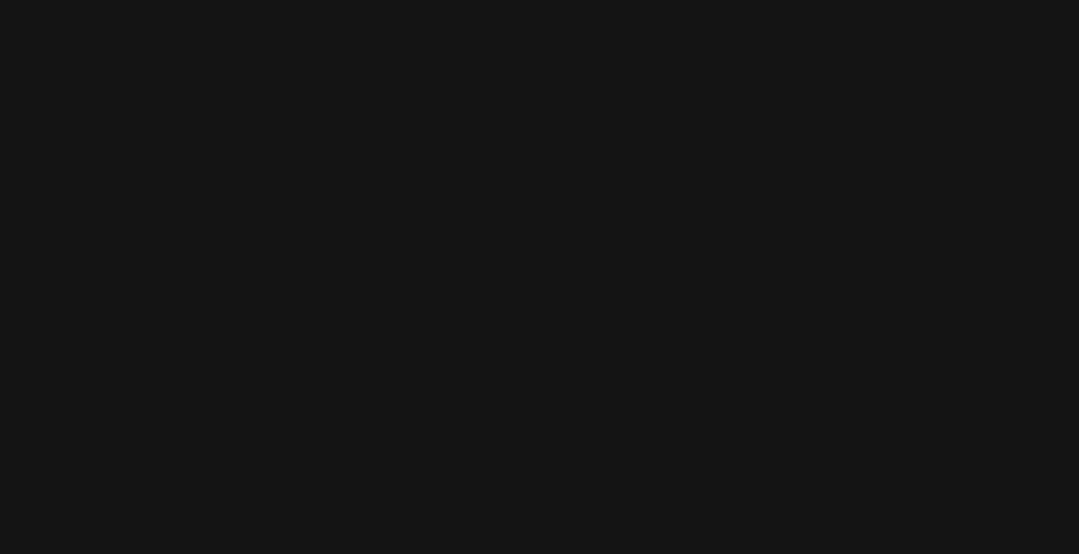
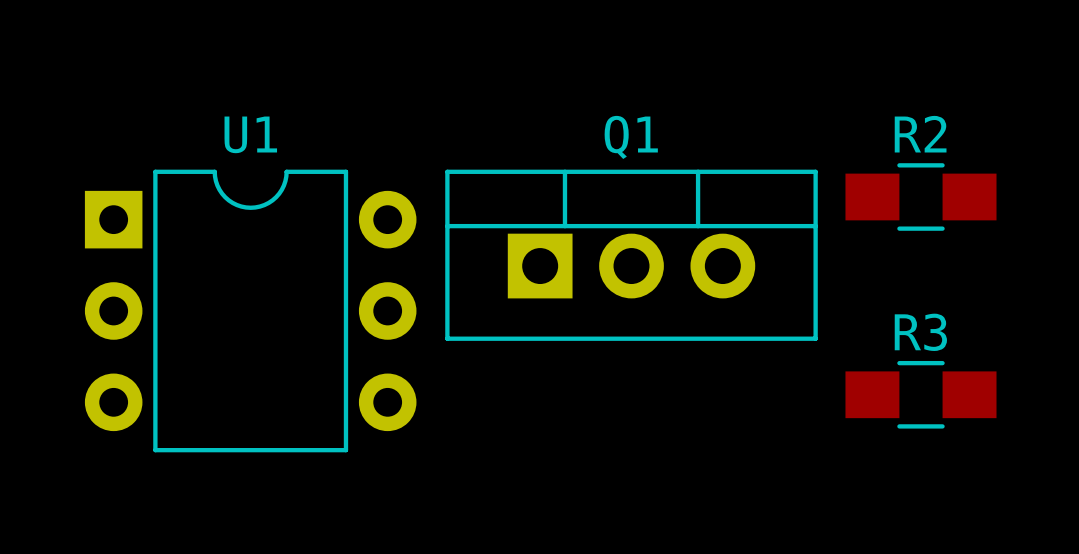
R2: none -> (920, 196)
Q1: none -> (631, 255)
U1: none -> (250, 310)
R3: none -> (920, 394)

